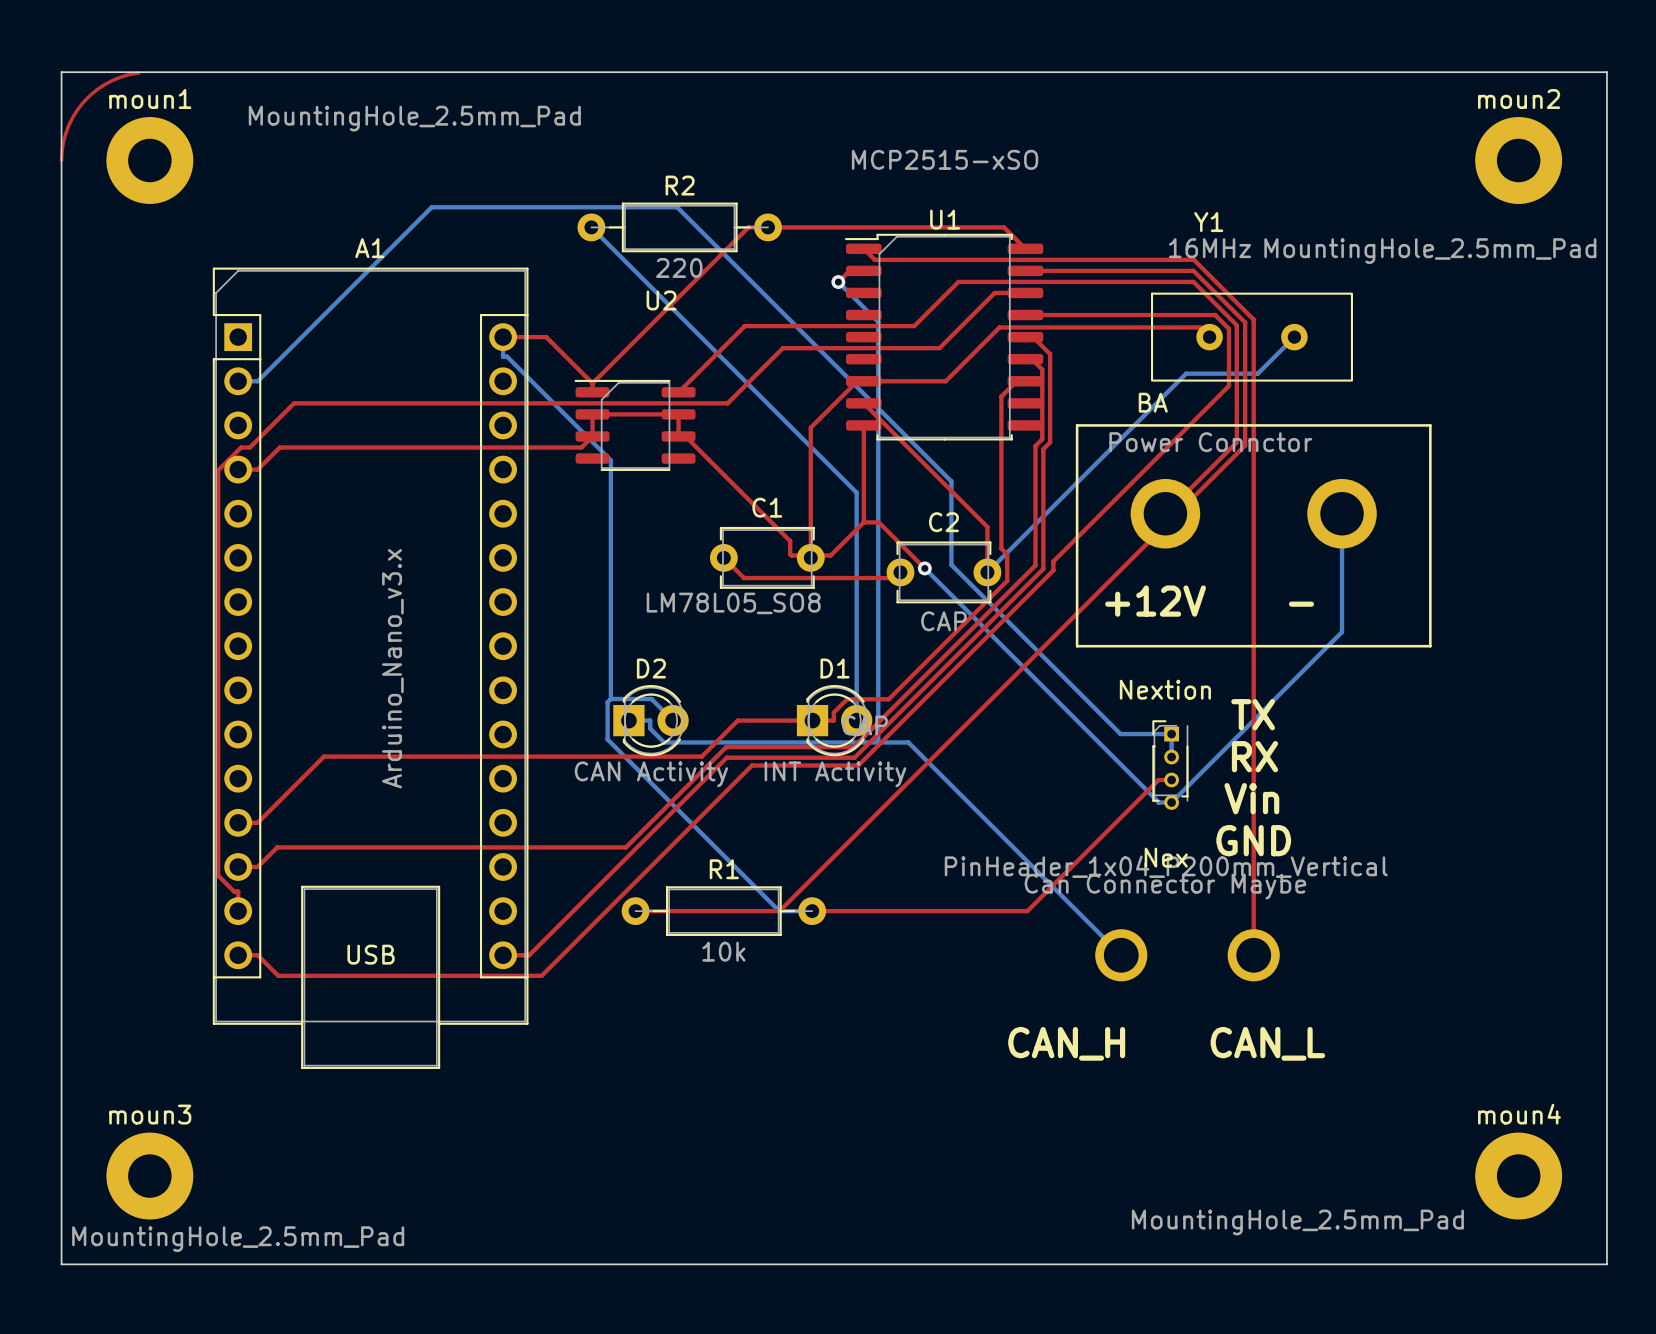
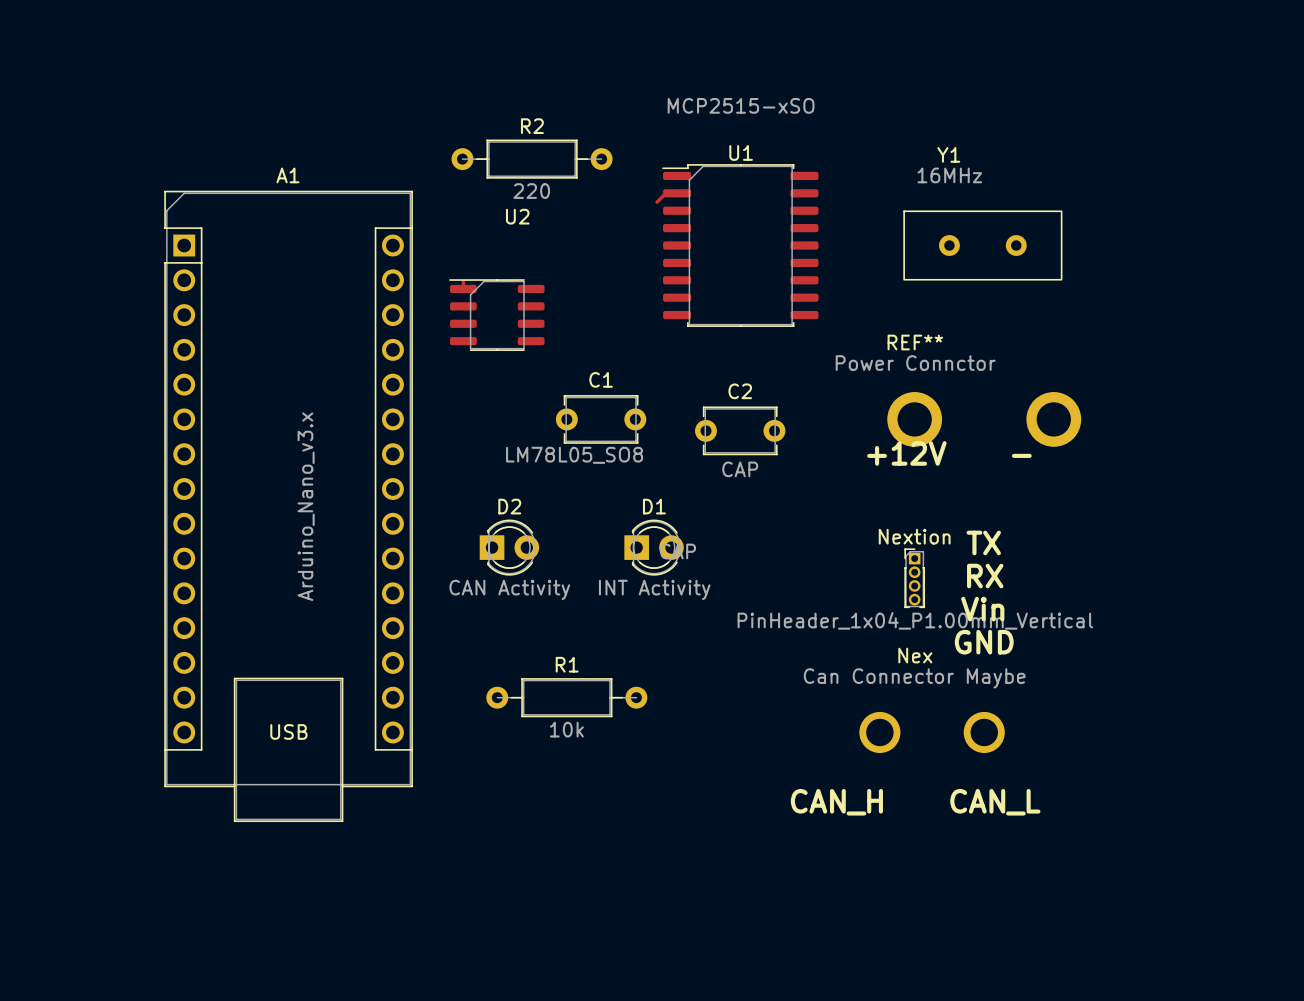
board edge: (61, 72) (1606, 72) (1606, 1264) (61, 1264) (61, 72) -> none
top track: (138, 72) (112, 80) (97, 89) (83, 102) (68, 125) (63, 142) (61, 160) -> none
moun1: MountingHole_2.5mm_Pad (149, 160) -> none
moun2: MountingHole_2.5mm_Pad (1518, 160) -> none
bottom track: (591, 227) (856, 492) (856, 720) -> none
top track: (863, 248) (874, 259) (1193, 259) (1253, 319) (1253, 955) -> none
top track: (1025, 248) (1004, 227) (748, 227) (592, 383) (546, 337) (503, 337) -> none
top track: (1025, 270) (1193, 270) (1245, 322) (1245, 445) (779, 911) (635, 911) -> none
bottom track: (838, 282) (878, 321) (878, 742) -> none
via: (838, 282) -> none
top track: (1025, 292) (994, 292) (939, 348) (782, 348) (727, 403) (294, 403) (249, 447) (241, 447) (218, 470) (218, 875) (234, 891) (238, 891) (238, 911) -> none
top track: (1025, 315) (1215, 315) (1229, 328) (1229, 385) (1053, 561) (1053, 570) (858, 765) (751, 765) (541, 975) (278, 975) (257, 955) (238, 955) -> none
bottom track: (503, 337) (503, 356) (507, 356) (610, 460) (610, 698) -> none
top track: (1025, 337) (1033, 337) (1050, 354) (1050, 442) (1043, 449) (1043, 568) (854, 757) (726, 757) (529, 955) (503, 955) -> none
top track: (1209, 337) (1199, 327) (999, 327) (945, 381) (857, 381) (810, 427) (810, 557) -> none
bottom track: (1294, 337) (1257, 373) (1186, 373) (987, 572) -> none
top track: (1025, 359) (1031, 359) (1042, 369) (1042, 439) (1035, 445) (1035, 565) (853, 747) (726, 747) (625, 847) (277, 847) (257, 866) (238, 866) -> none
bottom track: (238, 381) (257, 381) (431, 207) (677, 207) (951, 481) (951, 564) (1120, 734) (1171, 734) (1171, 757) -> none
top track: (1025, 381) (1016, 381) (1001, 396) (1001, 548) (1007, 554) (1007, 580) (888, 699) (847, 699) (833, 712) (833, 720) (737, 720) (701, 756) (323, 756) (257, 822) (238, 822) -> none
top track: (678, 392) (744, 326) (914, 326) (958, 281) (1193, 281) (1236, 325) (1236, 442) (1165, 513) -> none
top track: (863, 403) (987, 526) (987, 572) -> none
top track: (863, 425) (863, 522) -> none
line: (1077, 425) (1077, 646) (1430, 646) (1430, 425) (1077, 425) -> none
top track: (238, 469) (257, 469) (279, 447) (581, 447) (592, 436) (592, 414) (678, 414) (678, 436) (685, 436) (790, 541) (791, 555) (830, 555) (863, 522) -> none
BA: Power Connctor (1253, 513) -> none
bottom track: (1342, 513) (1342, 632) (1171, 802) (1158, 802) (924, 568) -> none
top track: (863, 522) (878, 522) (924, 568) -> none
top track: (723, 557) (744, 578) (894, 578) (900, 572) -> none
REF**: none -> Power Connctor (984, 419)
via: (924, 568) -> none
Nextion name position: Nextion (1165, 689) -> Nextion (914, 536)
bottom track: (610, 698) (651, 698) (673, 720) -> none
bottom track: (610, 698) (607, 702) (607, 739) (779, 911) (812, 911) -> none
bottom track: (628, 720) (650, 720) (650, 728) (664, 742) (908, 742) (1121, 955) -> none
Nextion footprint: [1152, 720, 1189, 810] -> [904, 548, 926, 609]
top track: (1171, 779) (1158, 779) (1027, 911) (812, 911) -> none
Nextion value: PinHeader_1x04_P200mm_Vertical (1166, 866) -> PinHeader_1x04_P1.00mm_Vertical (915, 620)
moun3: MountingHole_2.5mm_Pad (149, 1176) -> none
moun4: MountingHole_2.5mm_Pad (1518, 1176) -> none

